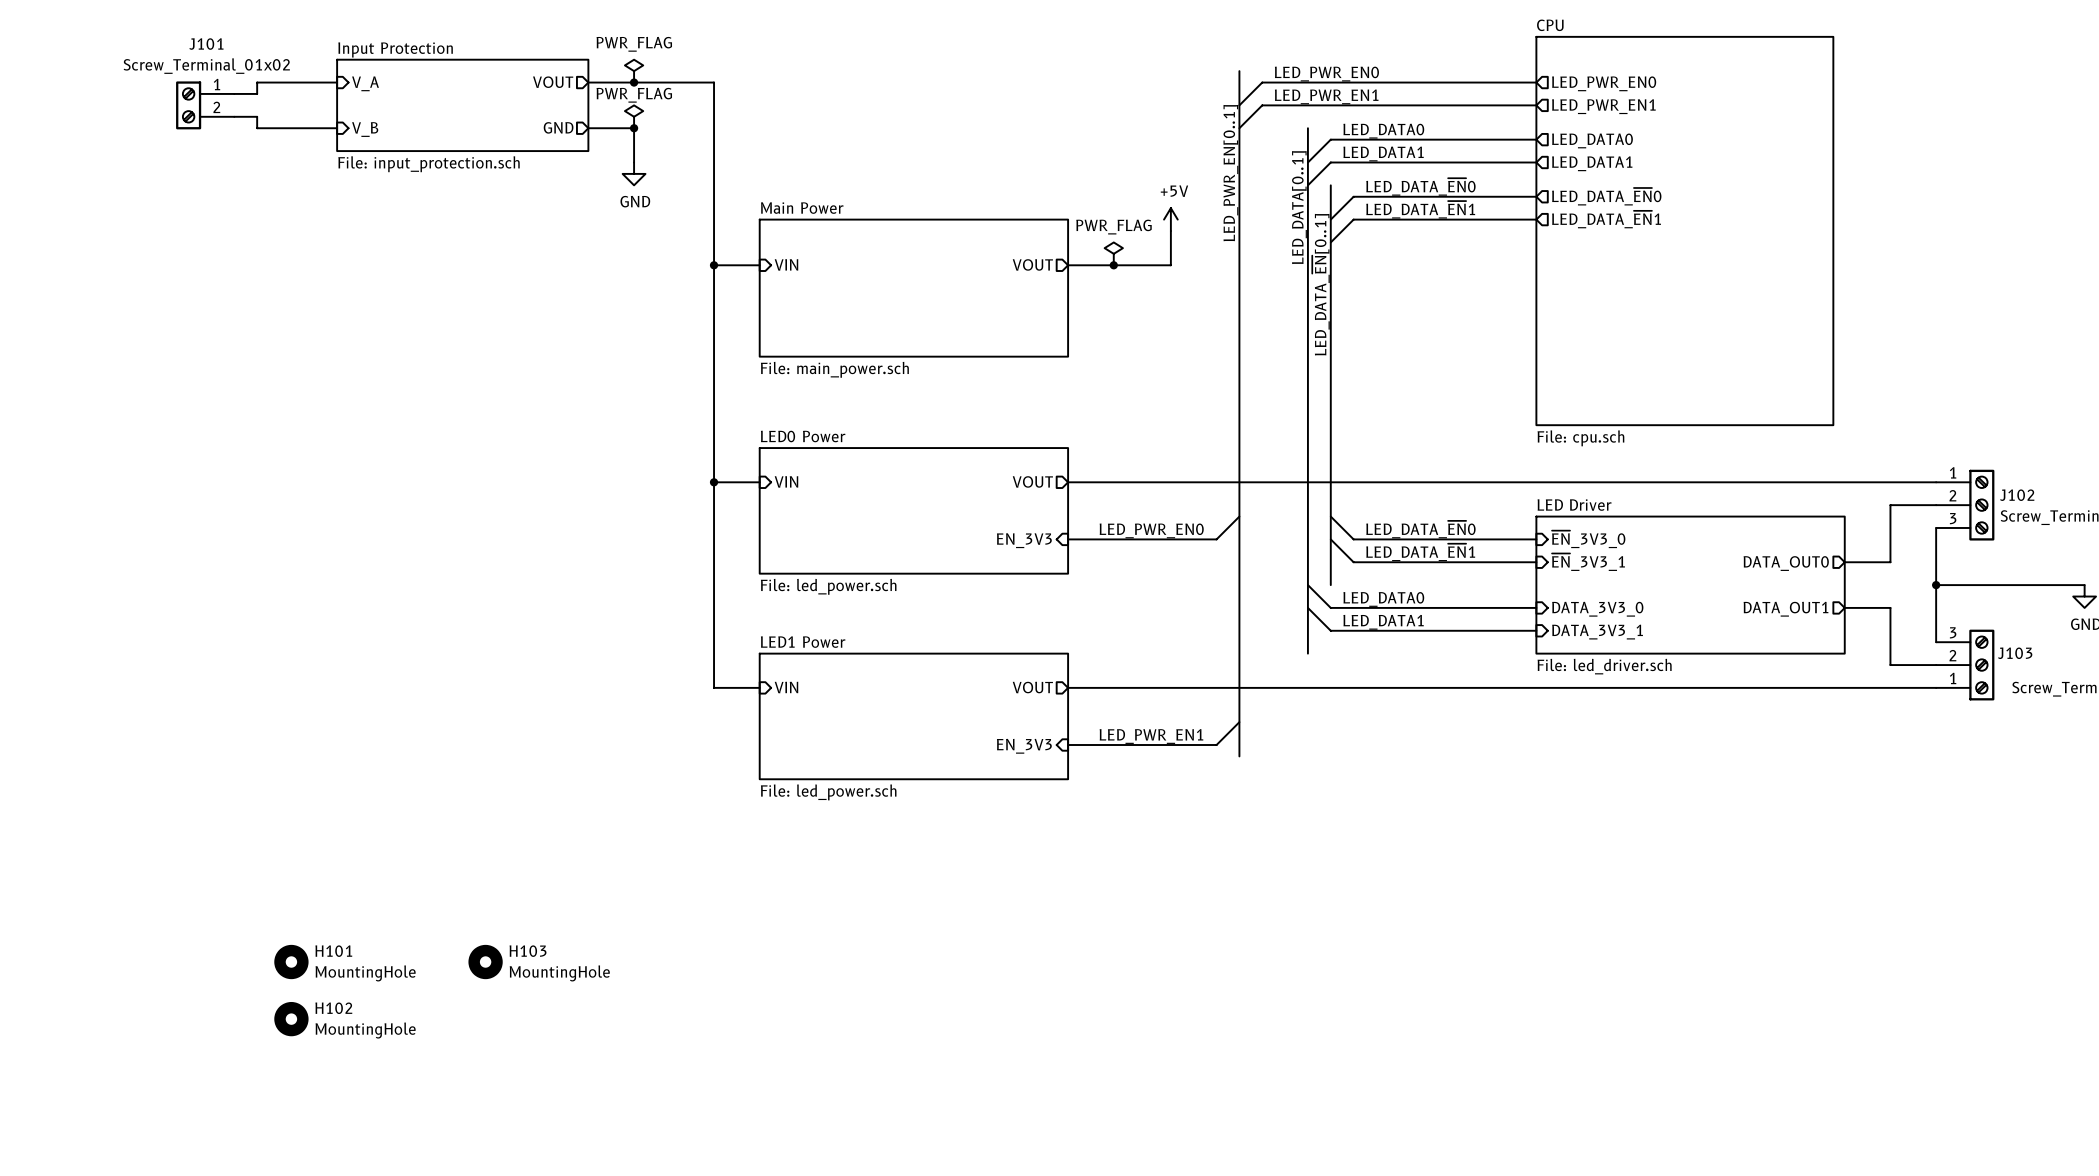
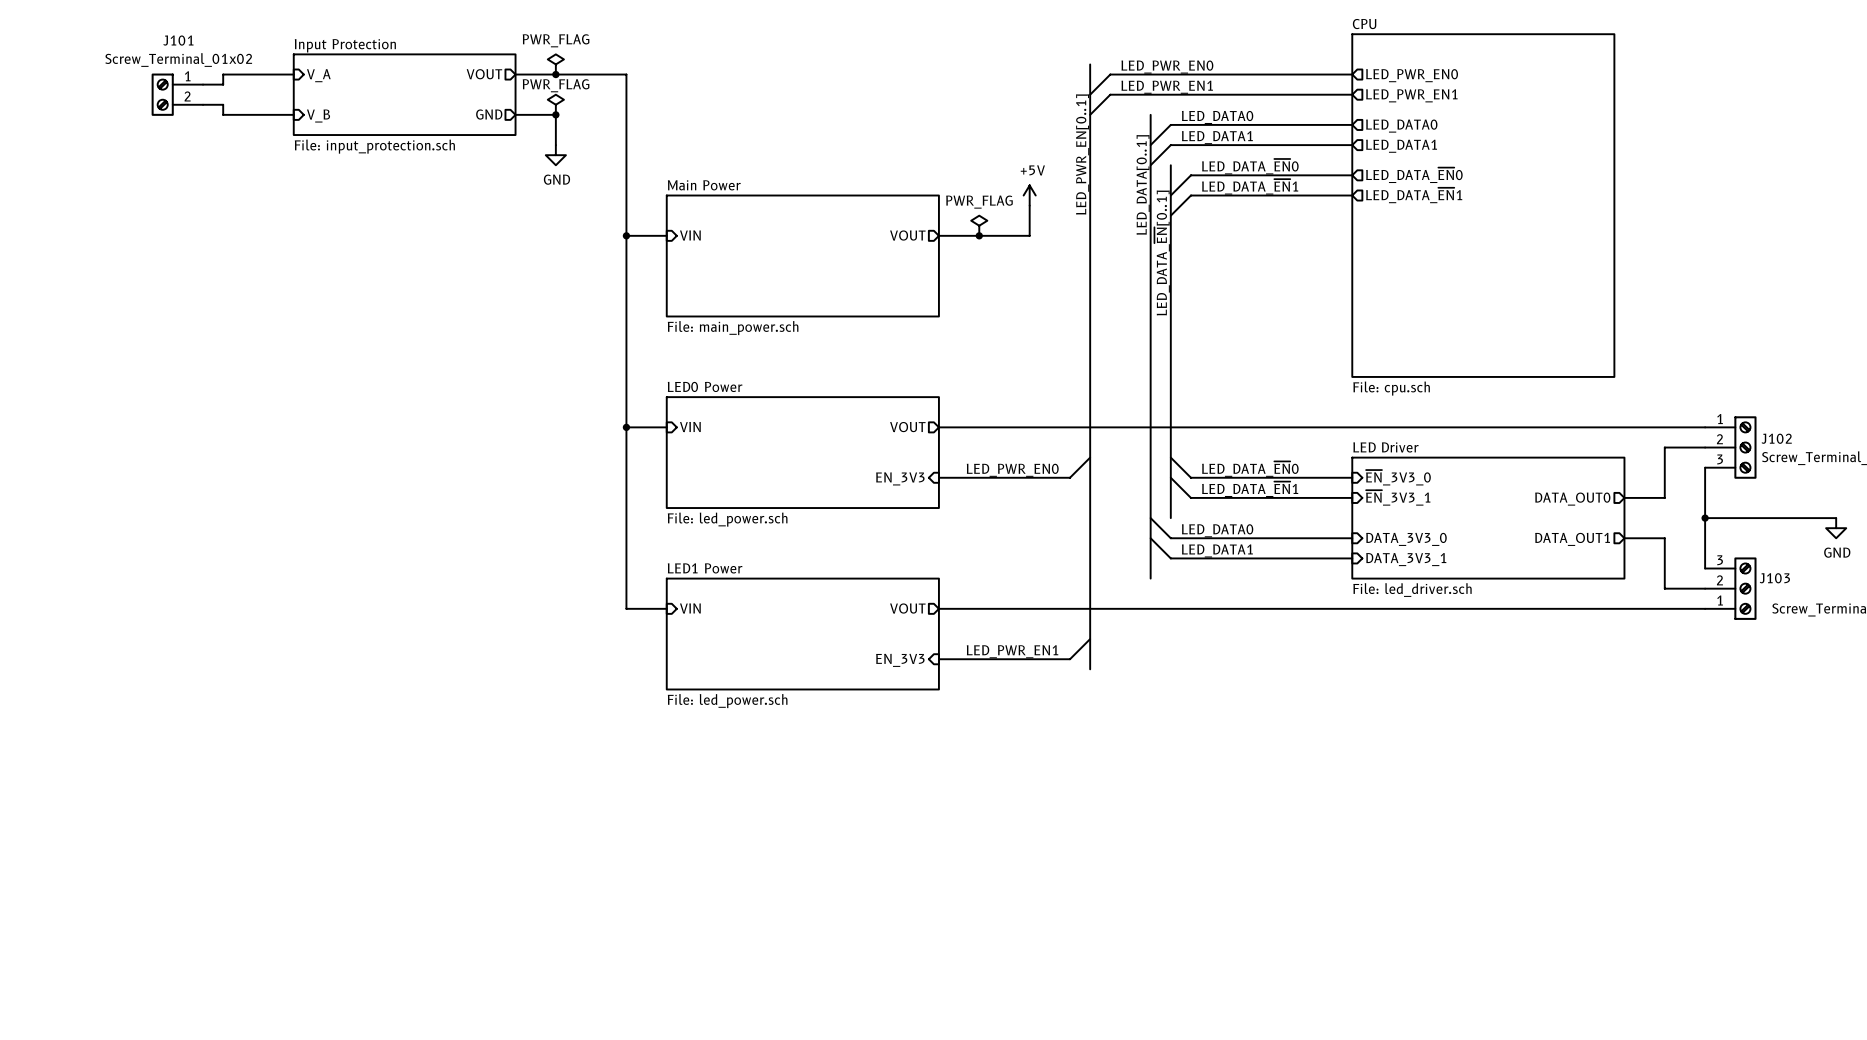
H101: MountingHole (291, 962) -> none
H103: MountingHole (485, 962) -> none
H102: MountingHole (291, 1019) -> none

